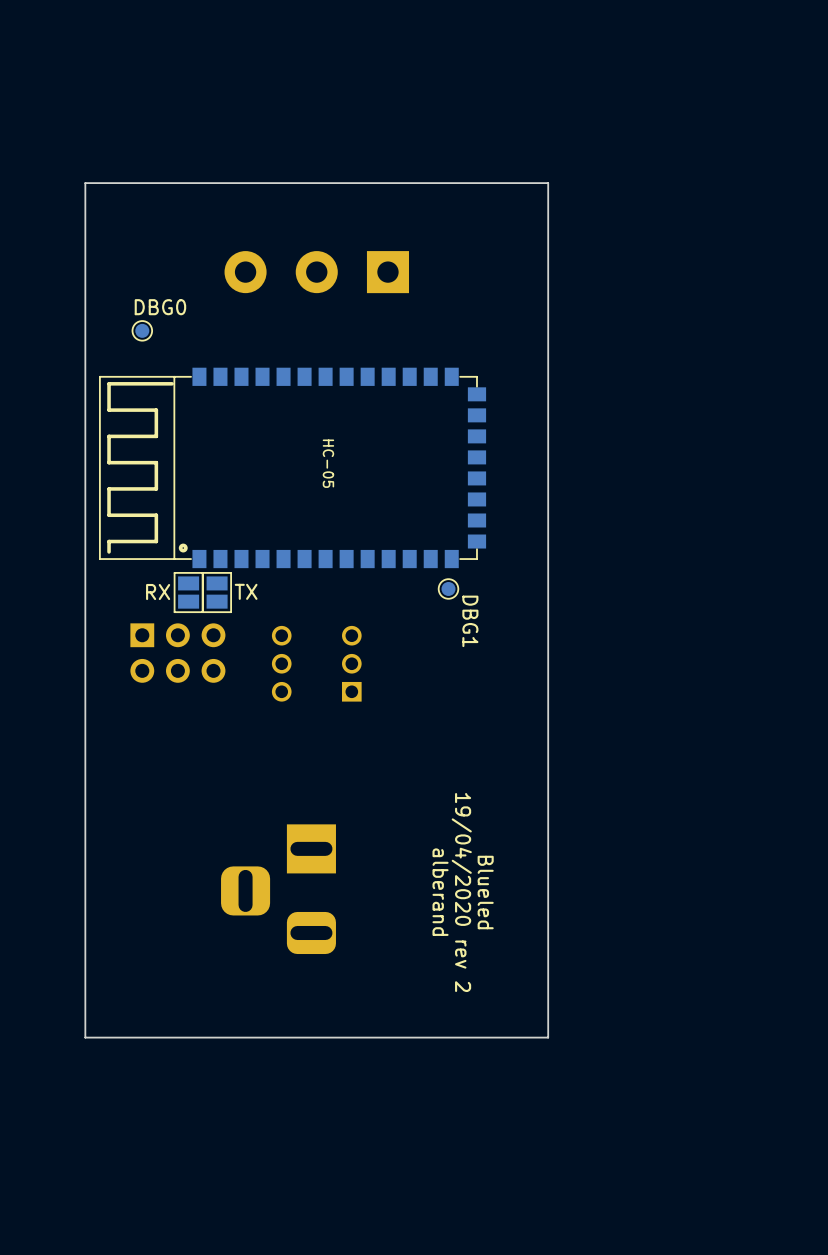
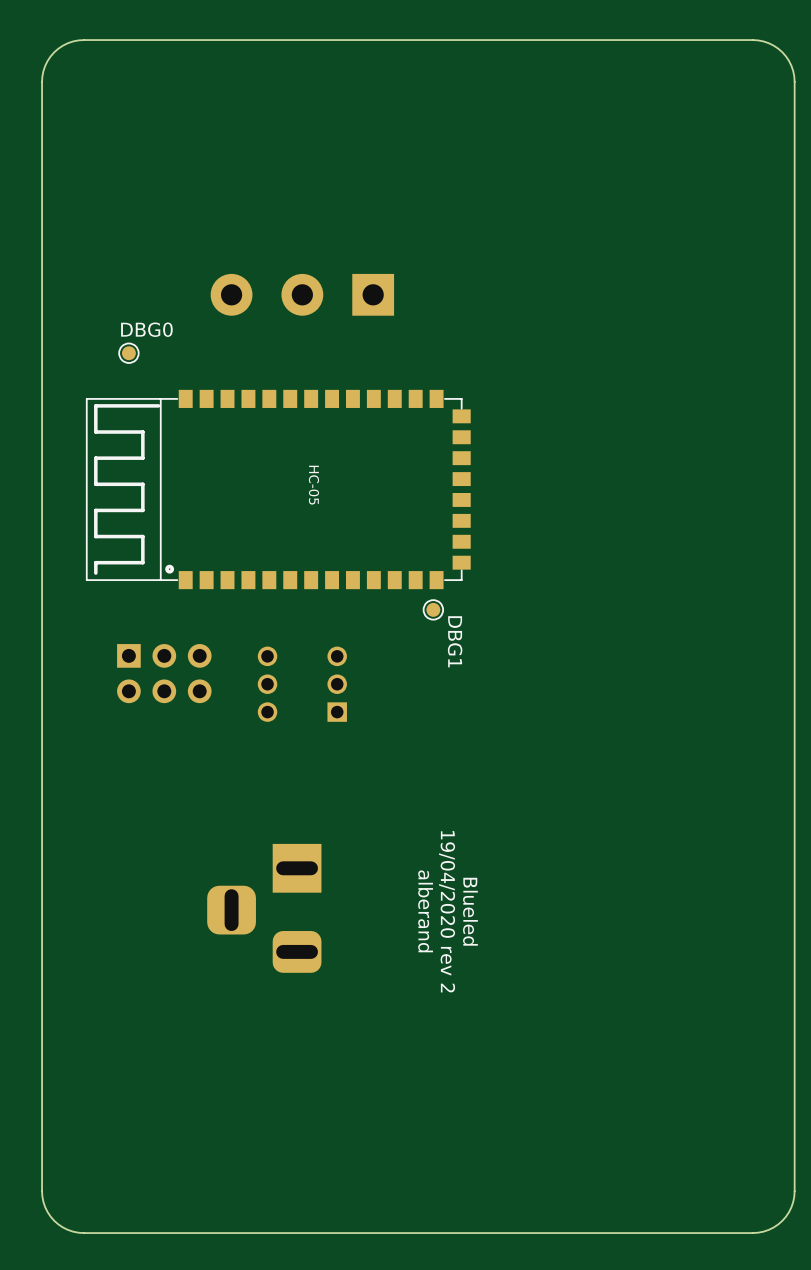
board edge: none -> (752, 40) (83, 40) (62, 45) (47, 60) (42, 81) (42, 1191) (47, 1212) (62, 1227) (83, 1233) (752, 1233) (773, 1227) (789, 1212) (794, 1191) (794, 81) (791, 65) (782, 52) (768, 43) (752, 40)
board edge: (548, 183) (548, 1037) (85, 1037) (85, 183) (548, 183) -> none
RX: (188, 592) -> none
TX: (217, 592) -> none

